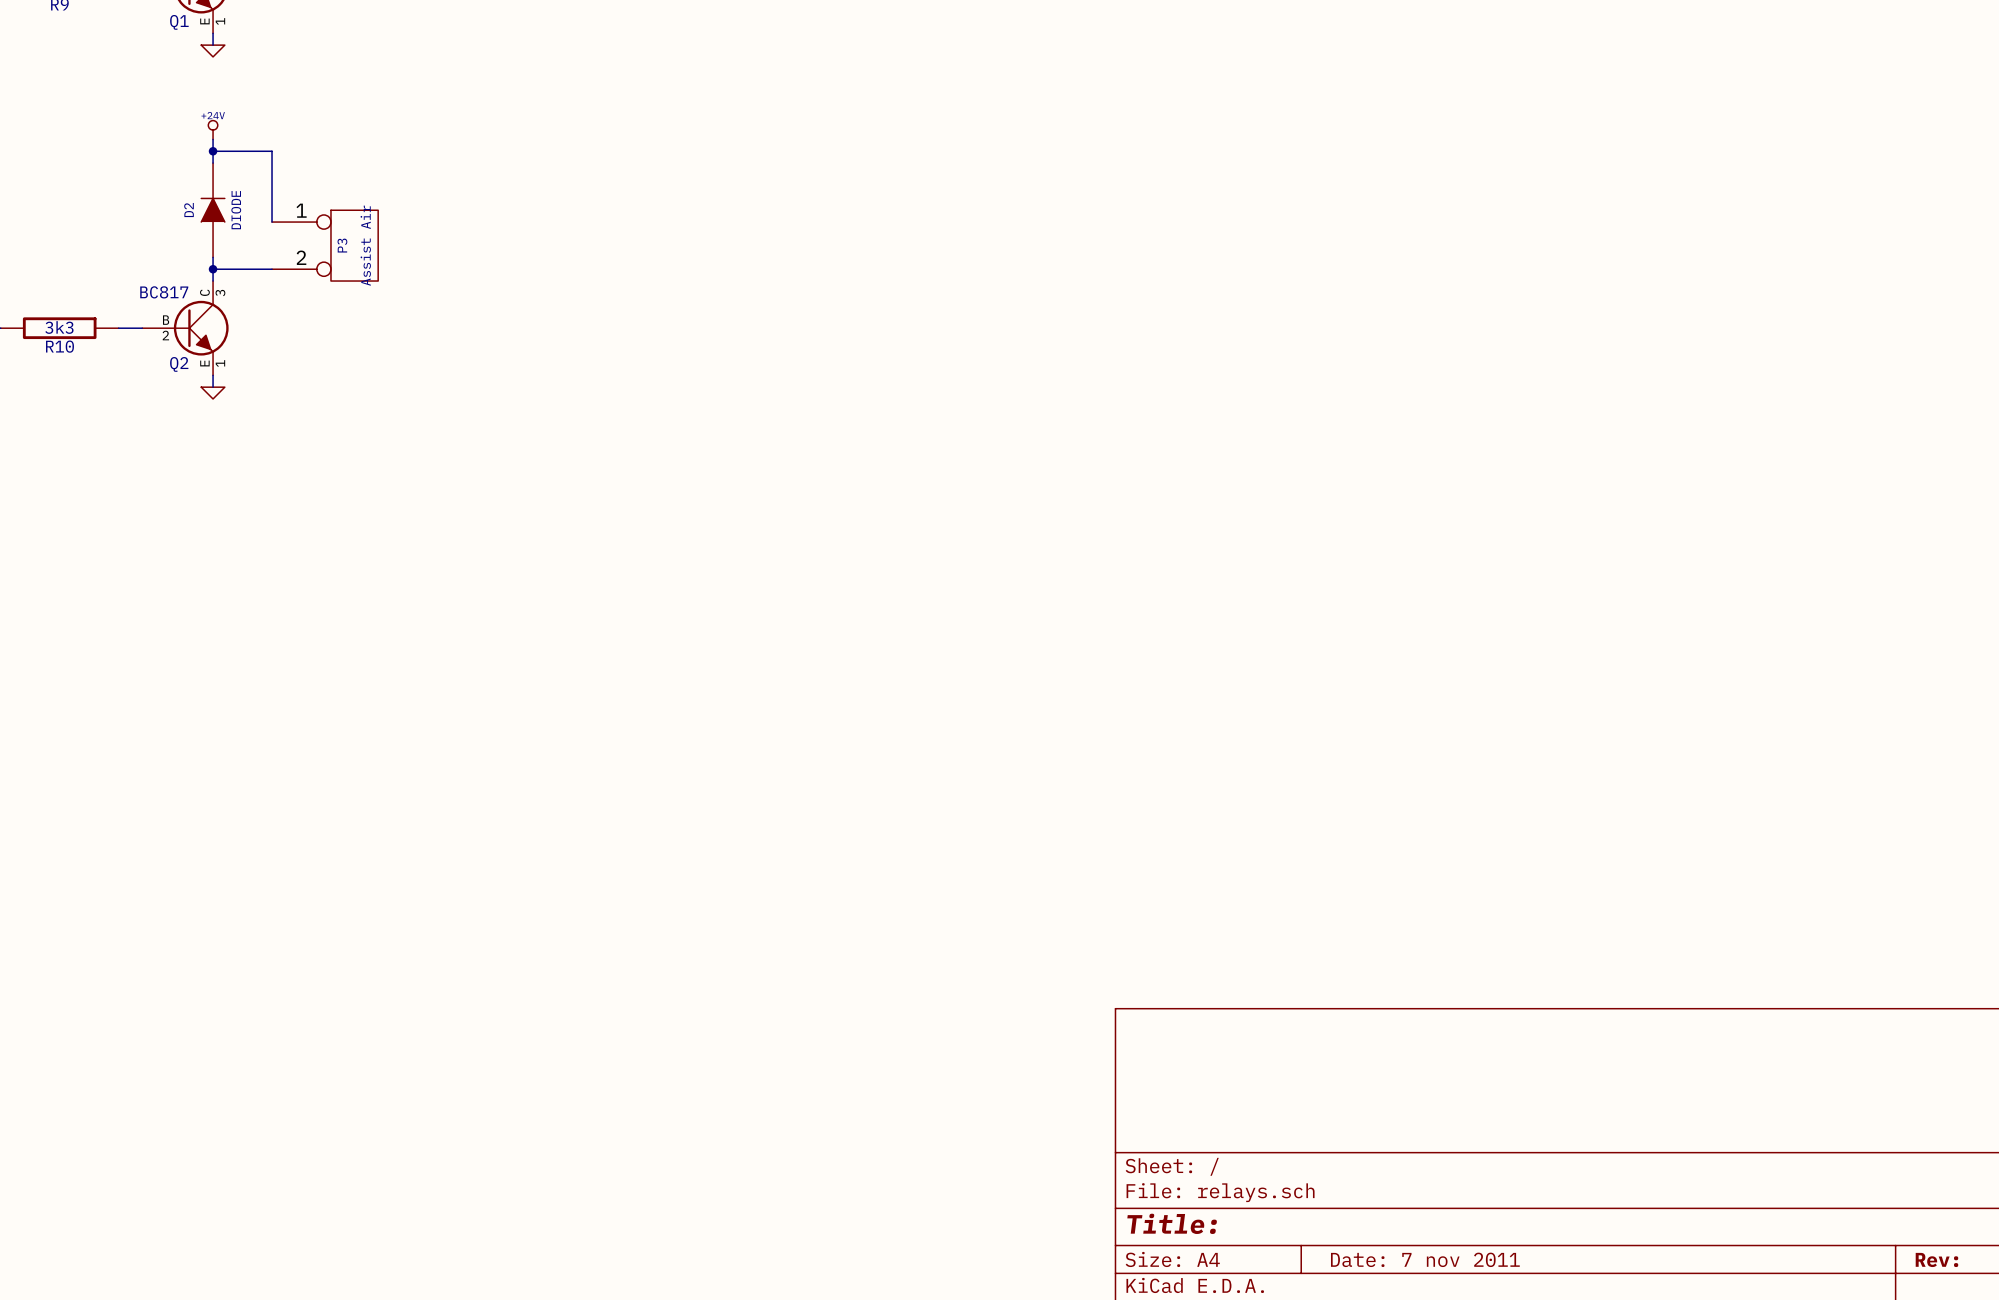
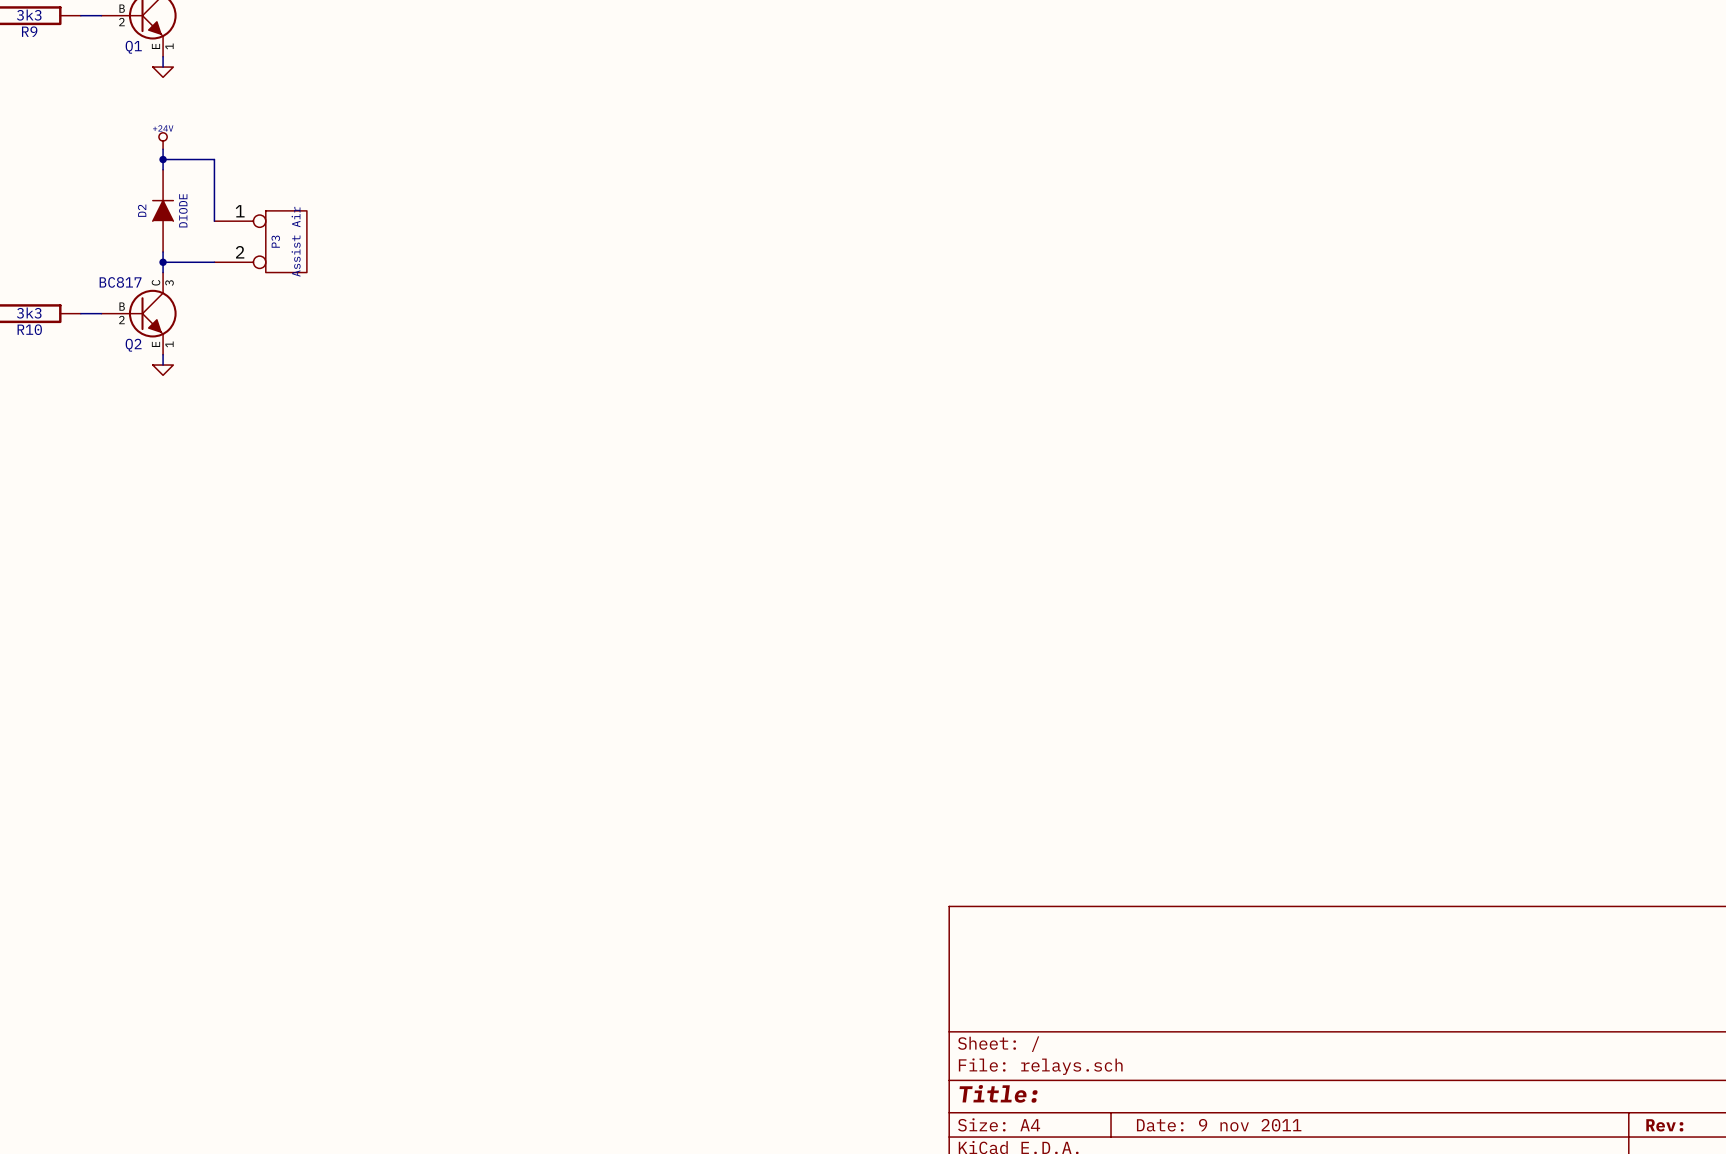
title block: Date: 7 nov 2011 (1425, 1259) -> Date: 9 nov 2011 (1219, 1125)

